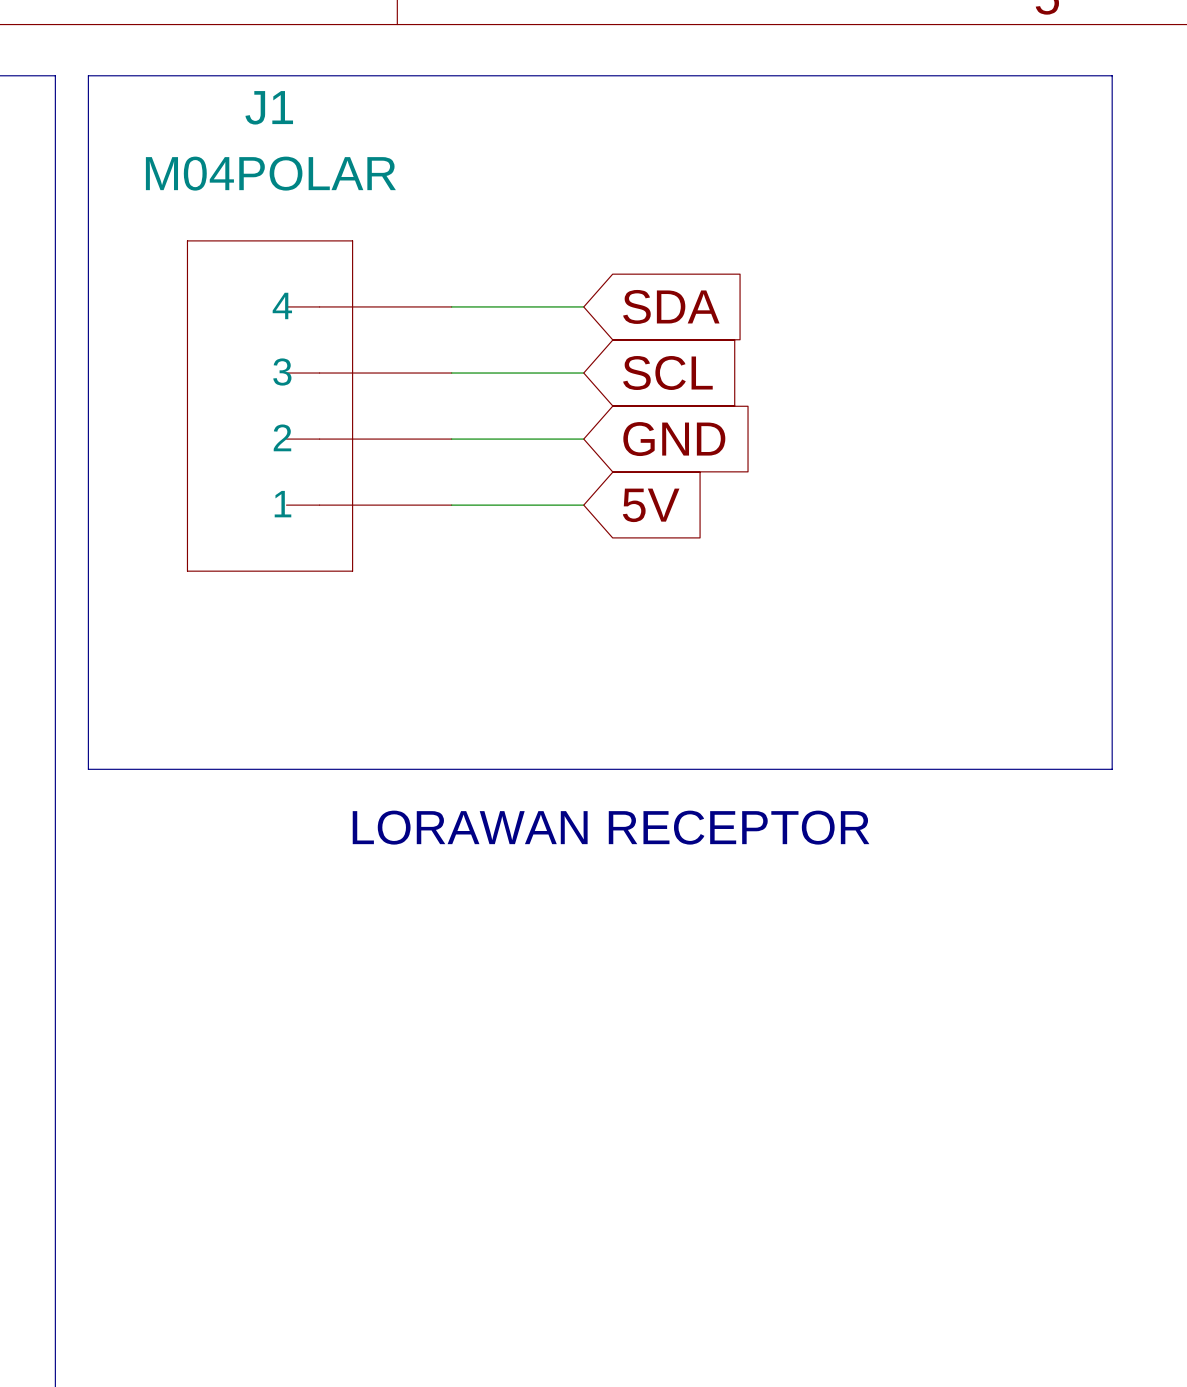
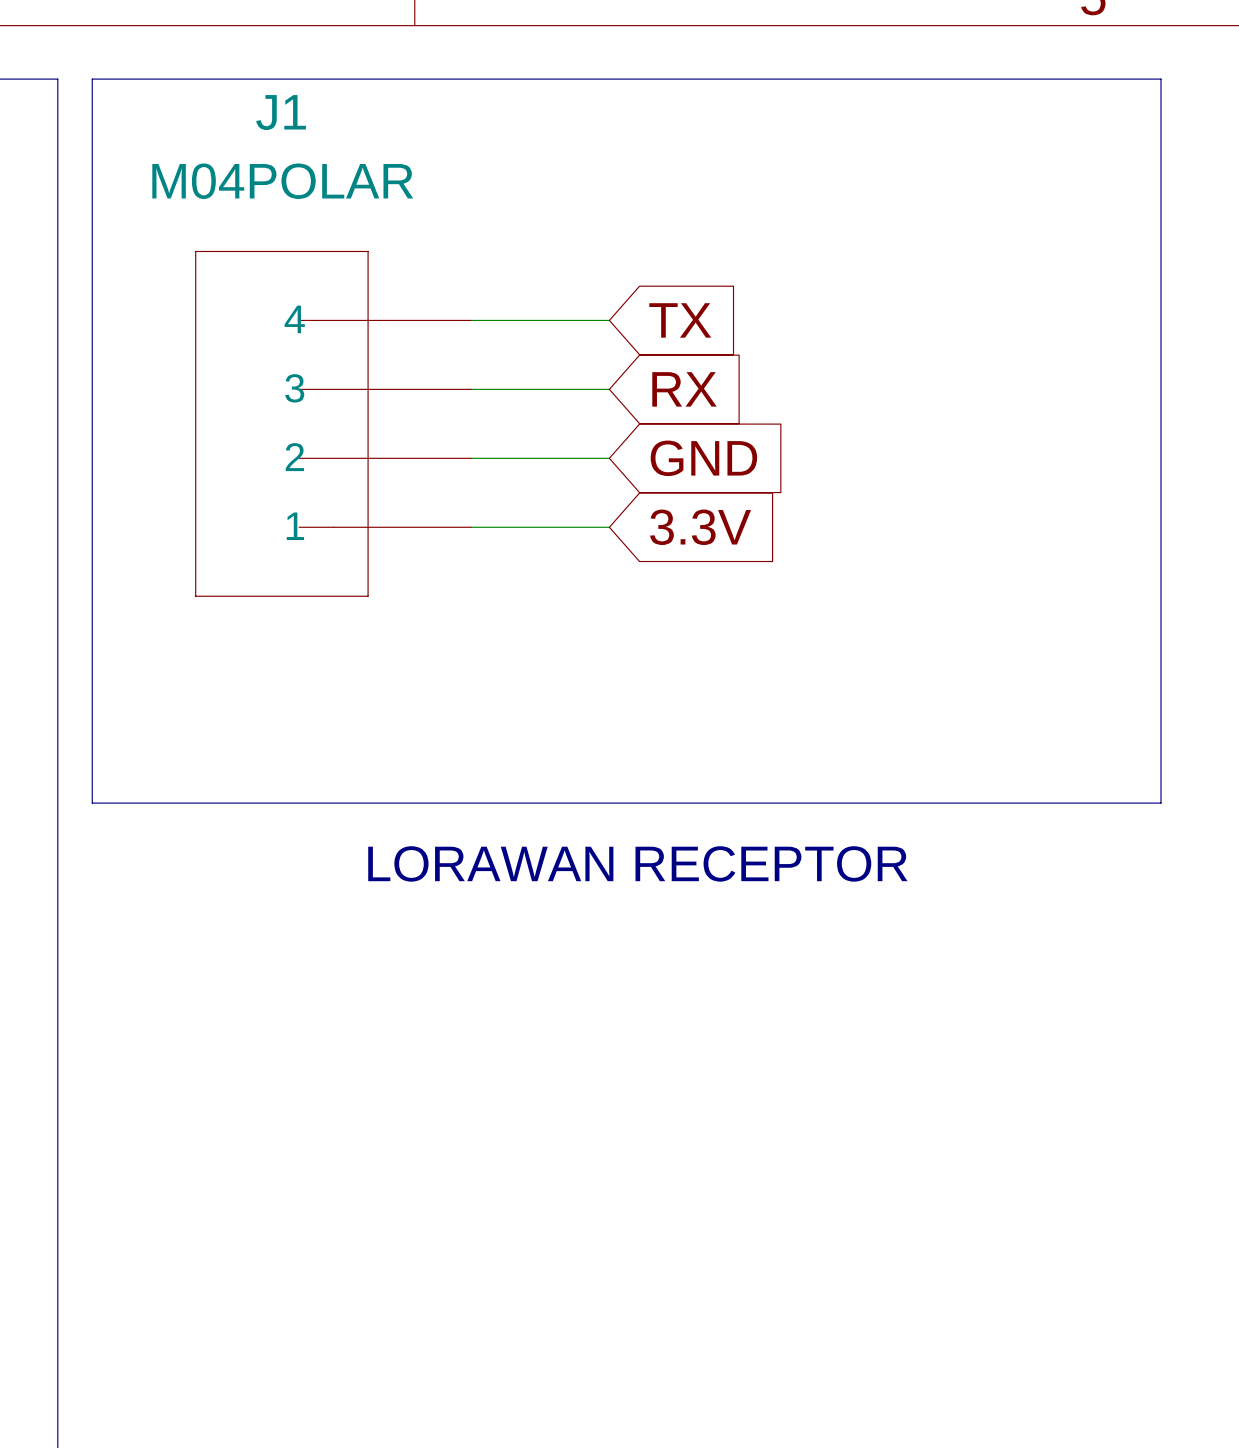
global label: SDA (671, 306) -> TX (680, 320)
global label: SCL (667, 373) -> RX (684, 389)
global label: 5V (651, 505) -> 3.3V (700, 527)

